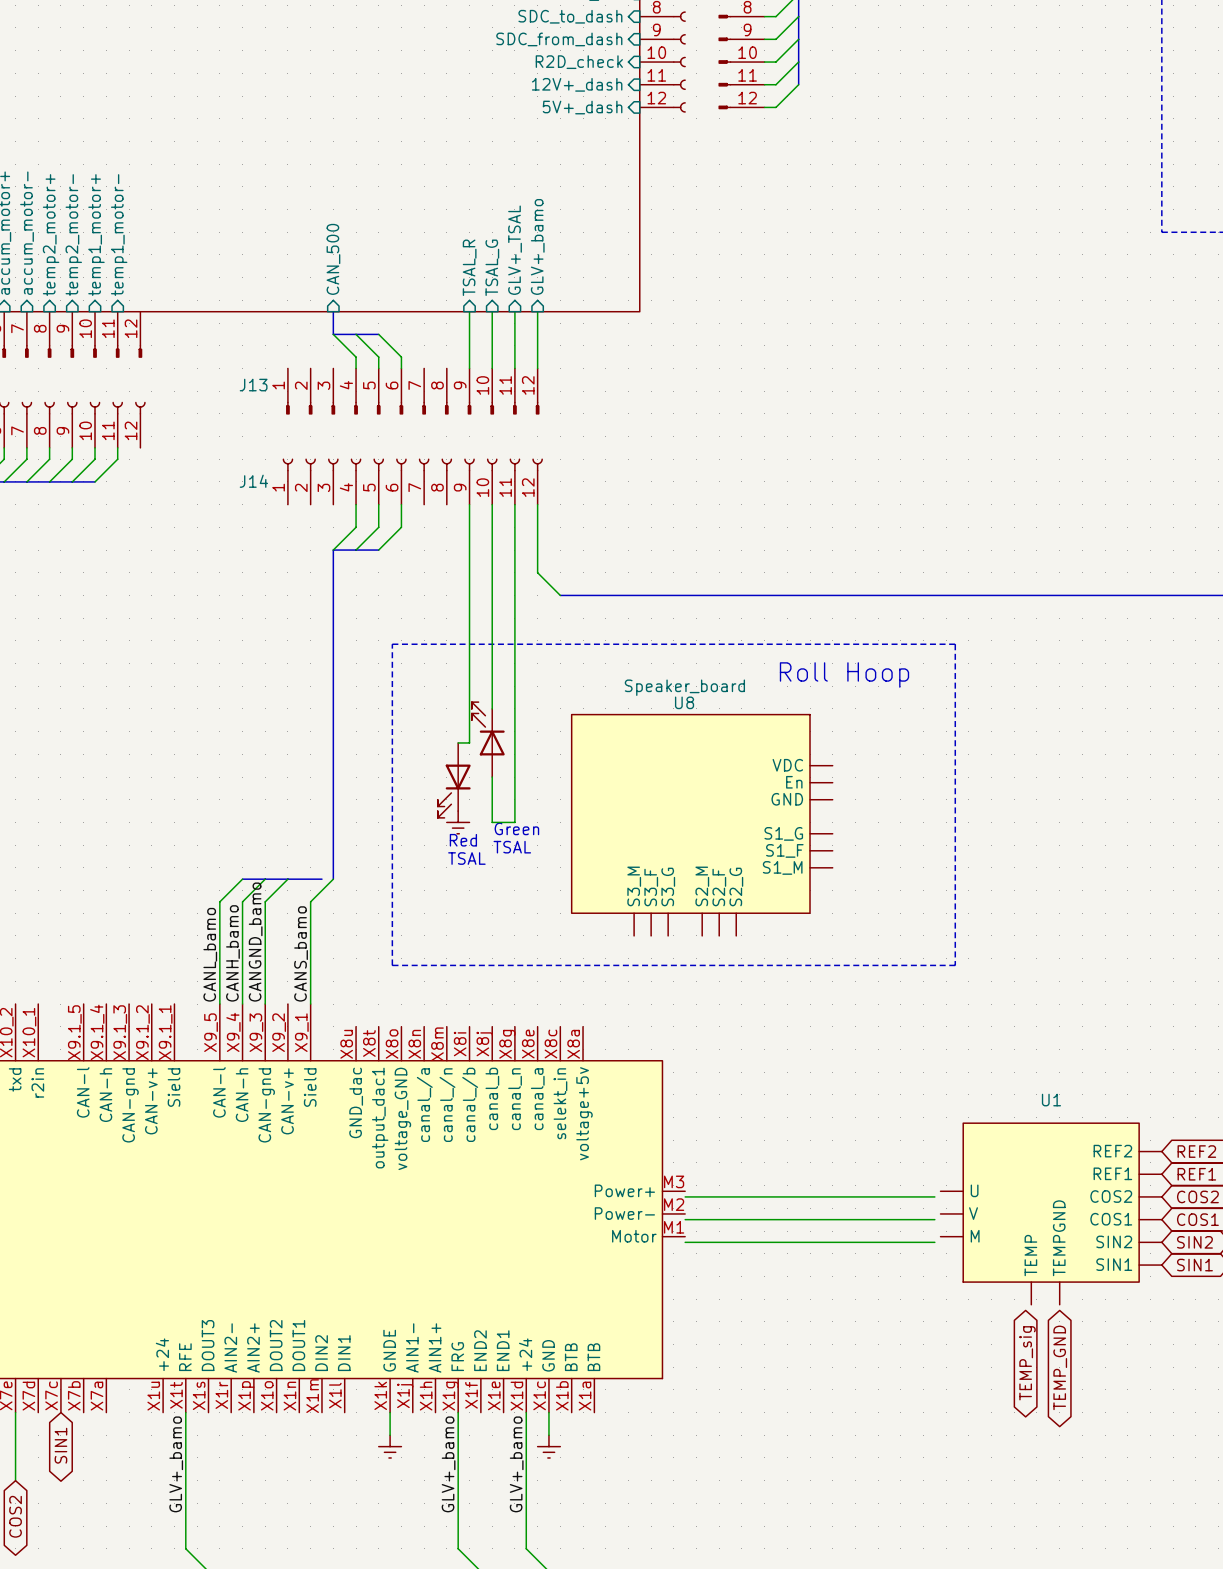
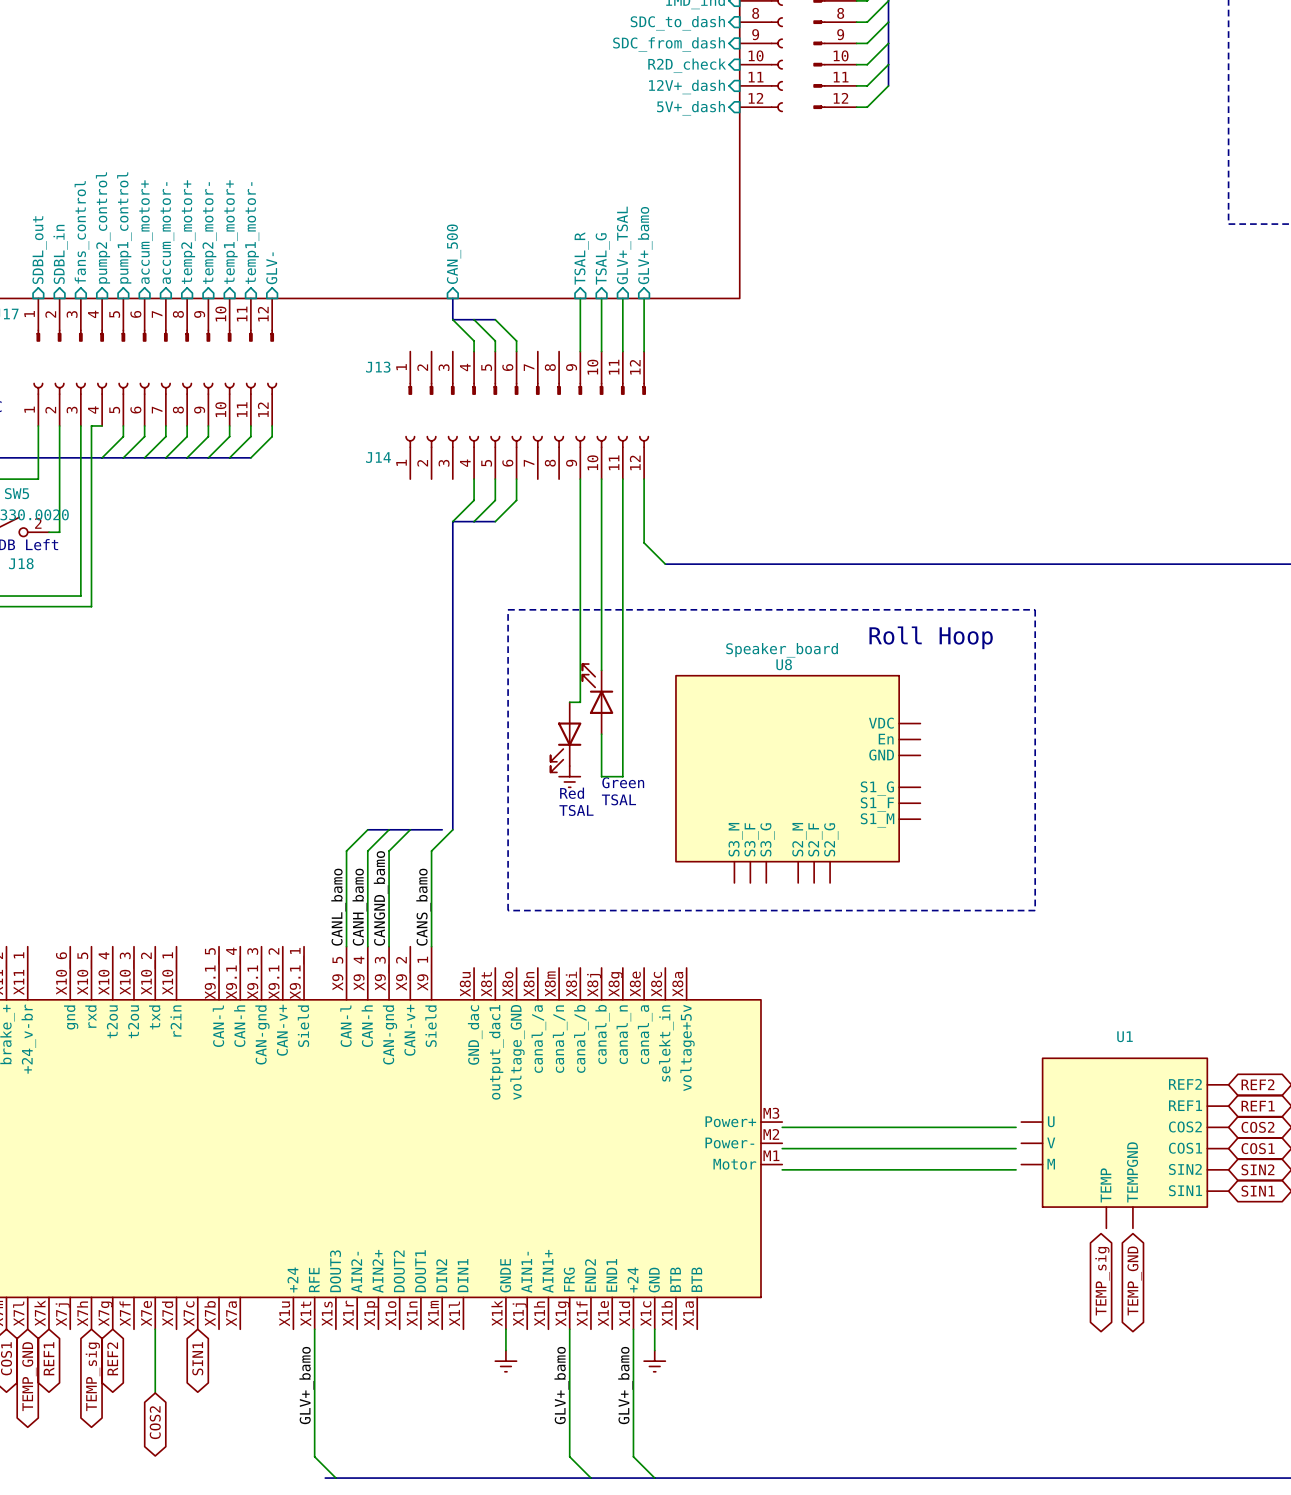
sheet pin: none -> GLV- (271, 268)
wire: none -> (272, 425) (272, 436) (250, 457)
bus: none -> (229, 457) (250, 457)

